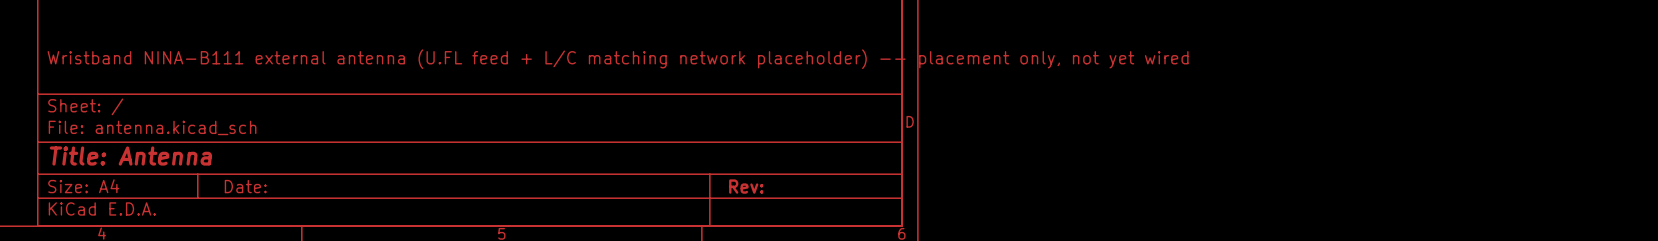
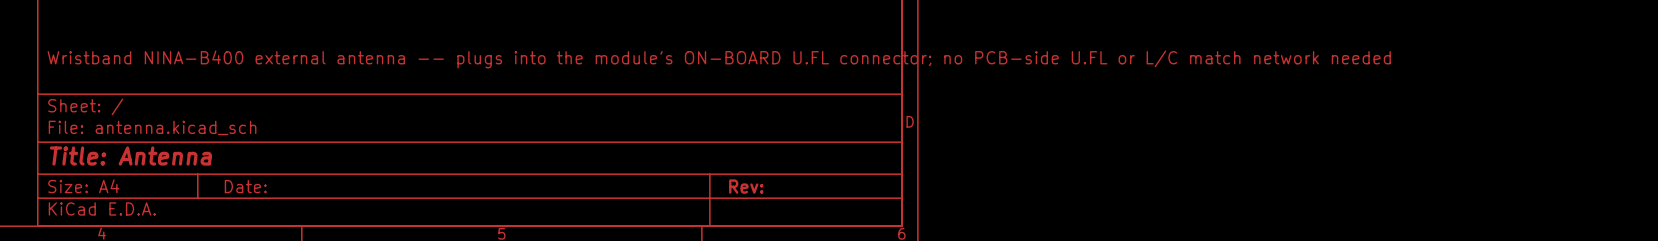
title block: Wristband NINA-B111 external antenna (U.FL feed + L/C matching network placeholder) -- placement only, not yet wired (618, 59) -> Wristband NINA-B400 external antenna -- plugs into the module's ON-BOARD U.FL connector; no PCB-side U.FL or L/C match network needed (719, 59)

